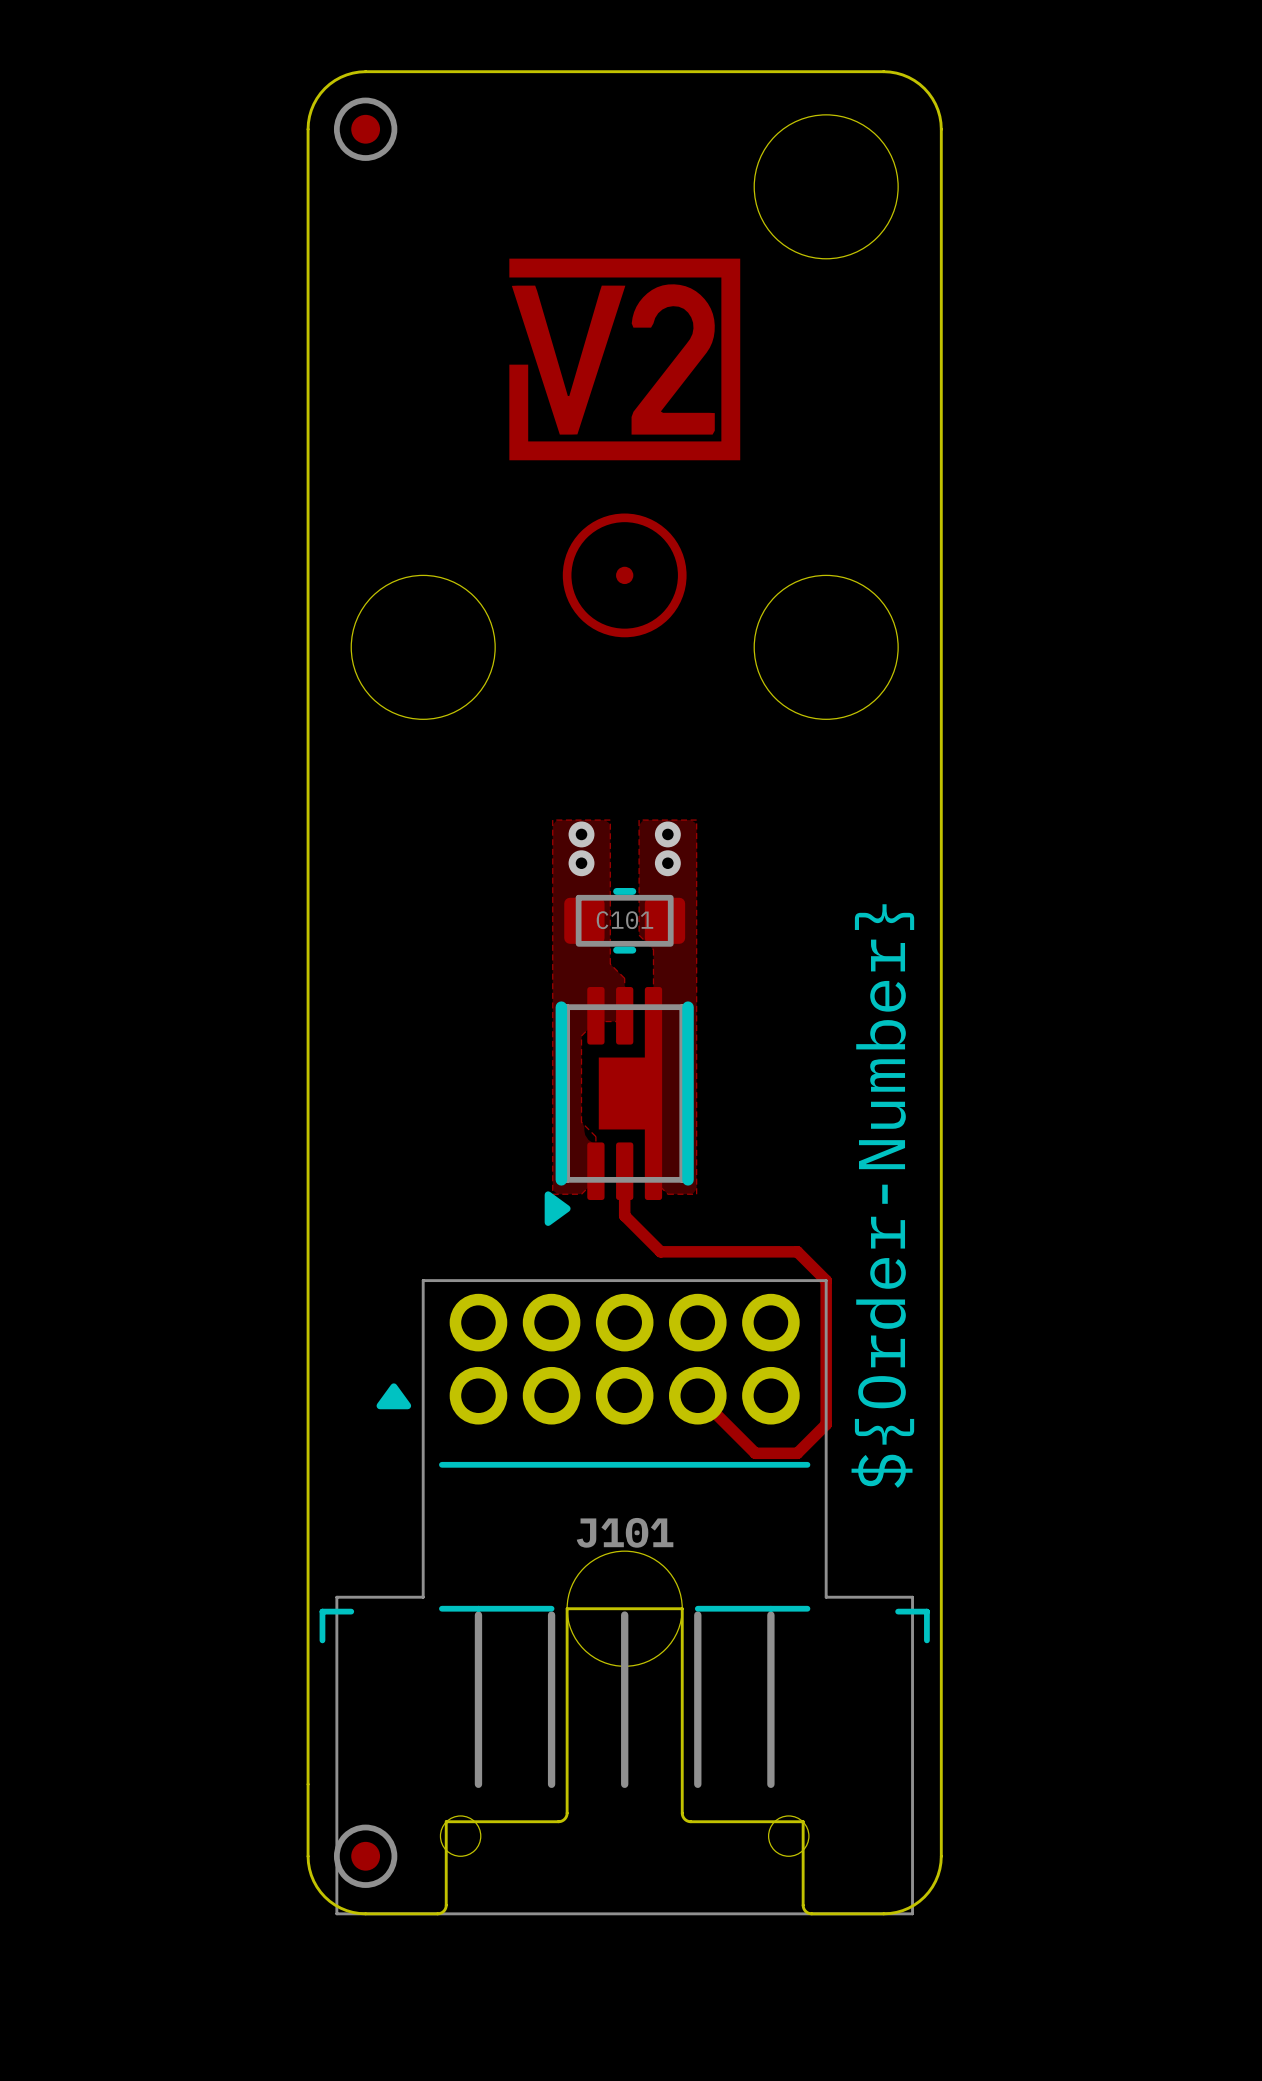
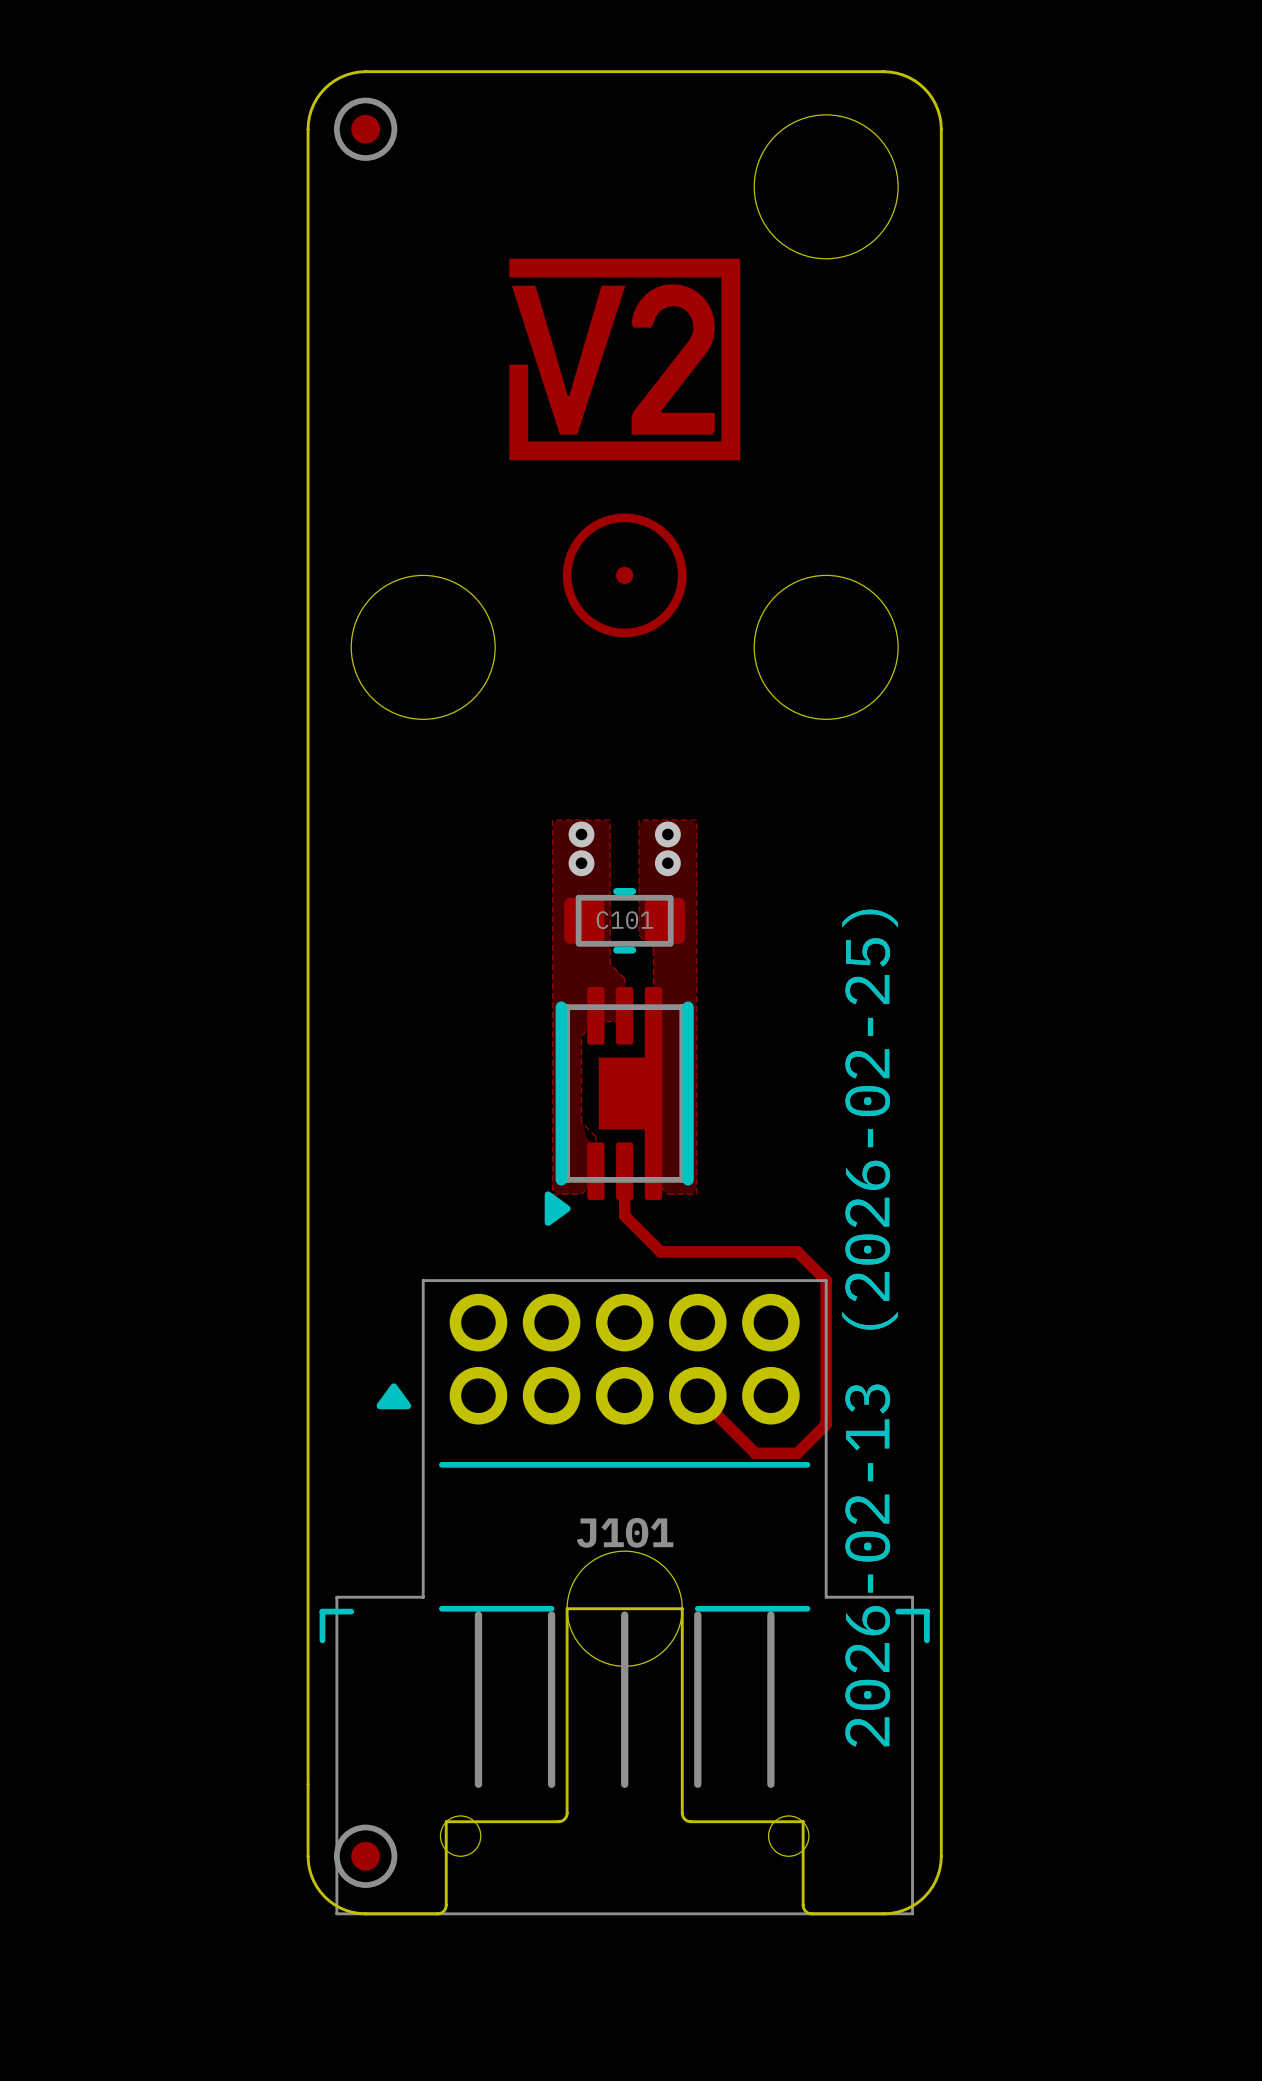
drawing: [851, 904, 915, 1488] -> none
drawing: none -> [842, 909, 898, 1747]

